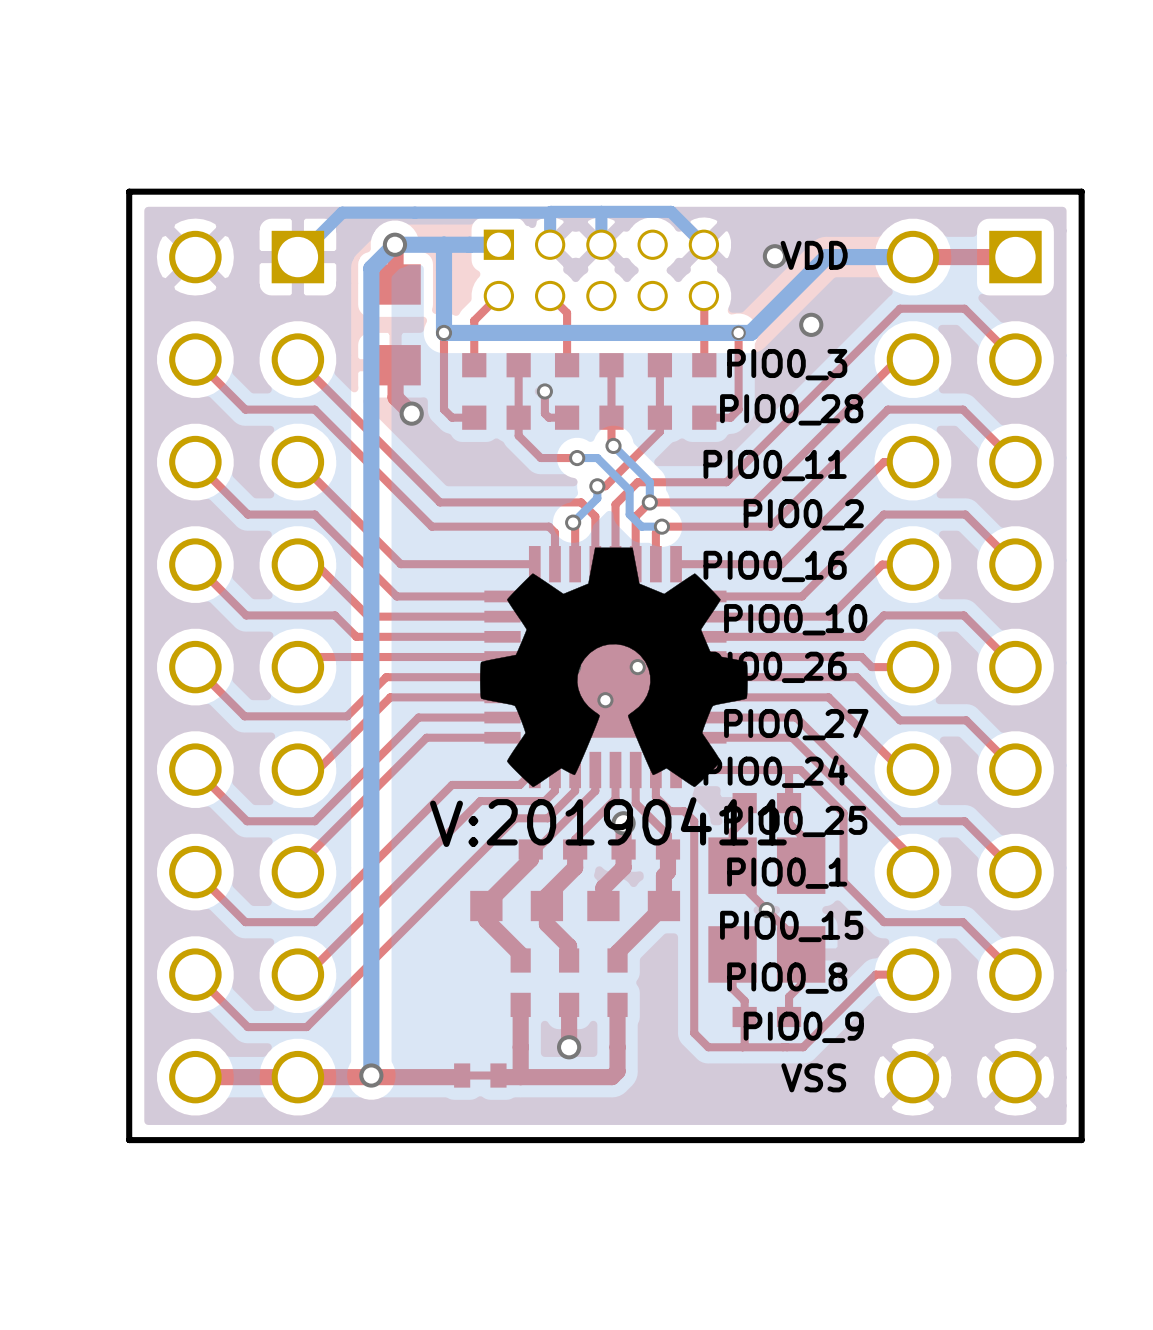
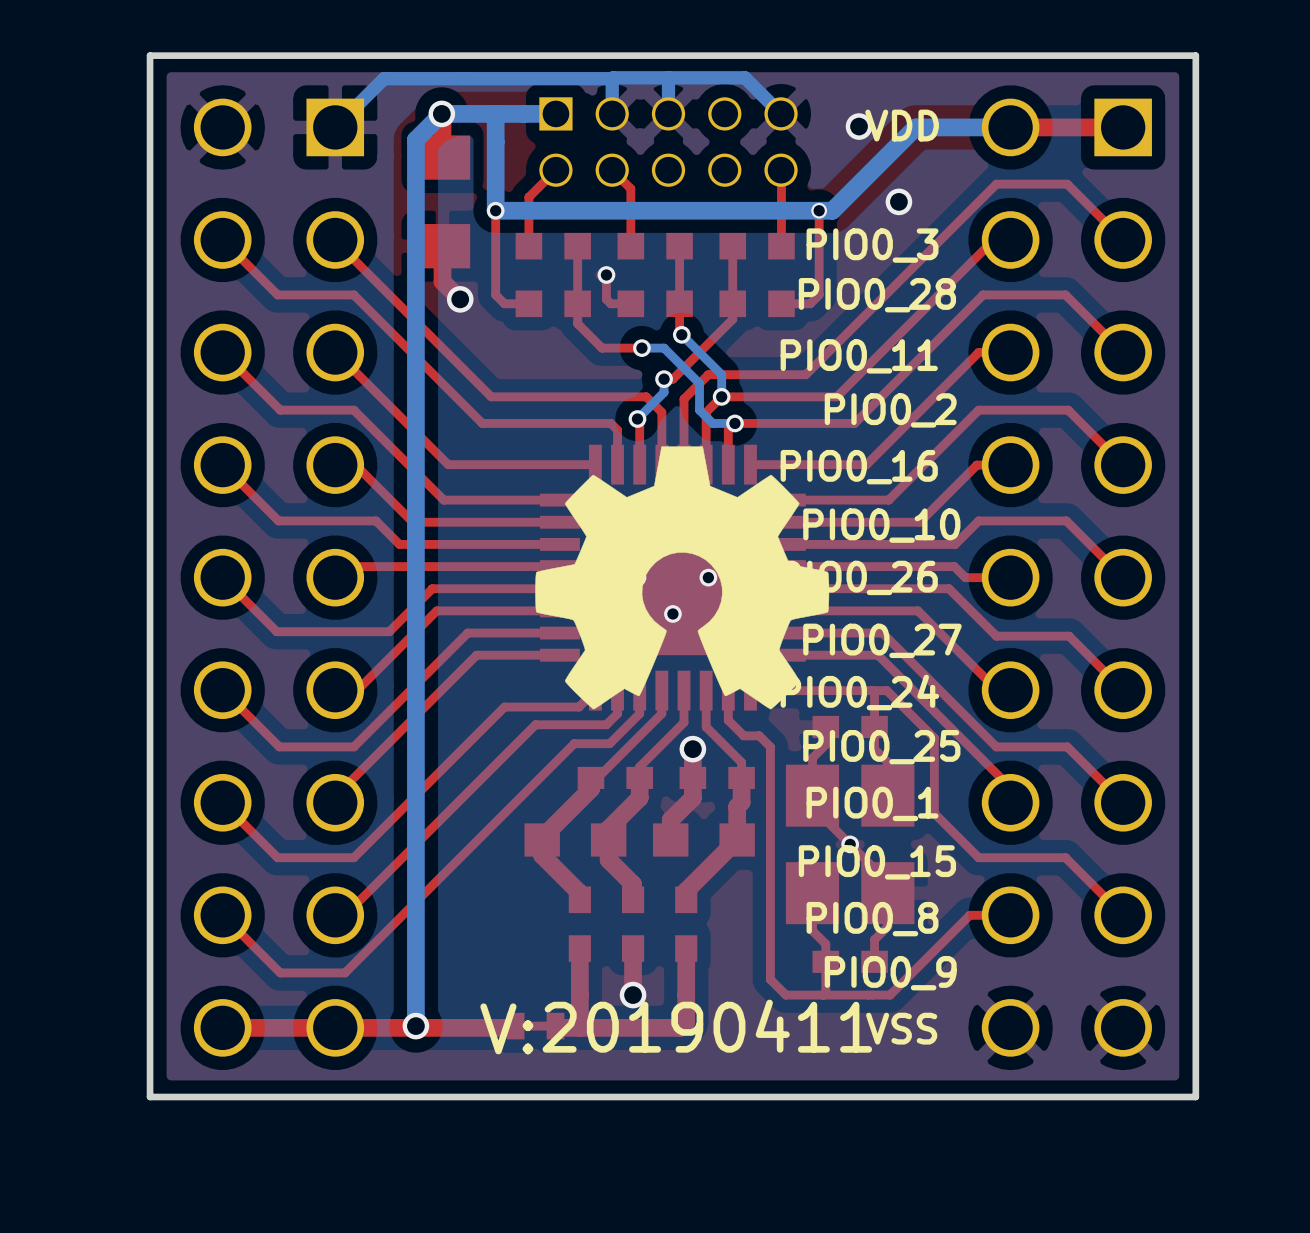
drawing position: (608, 822) -> (676, 1026)

